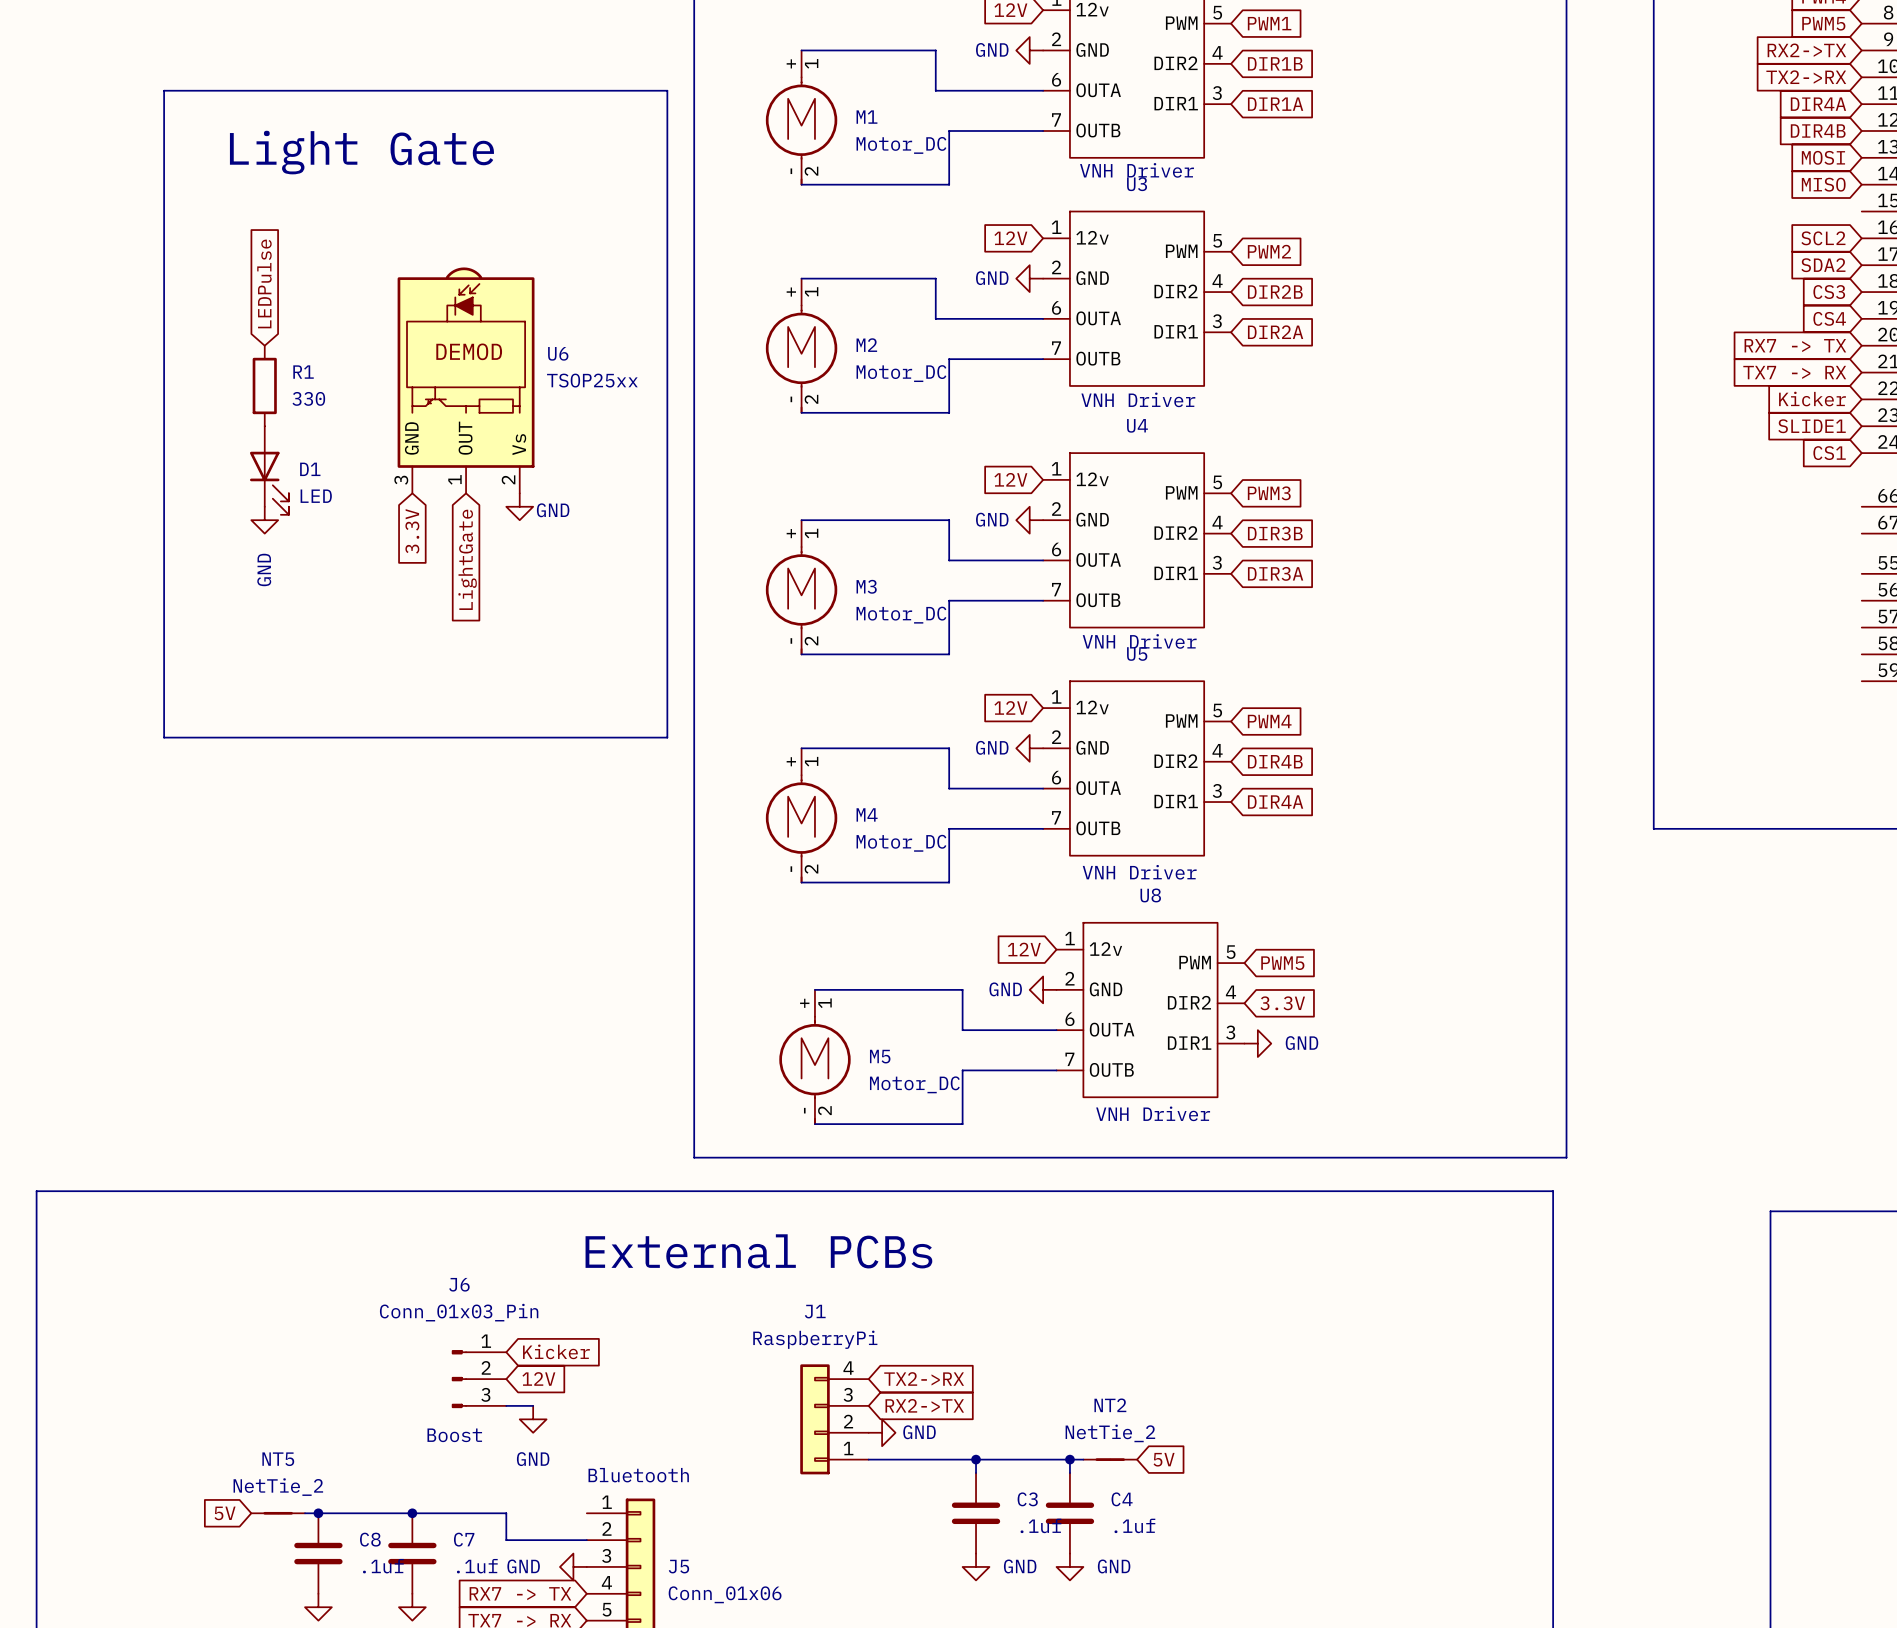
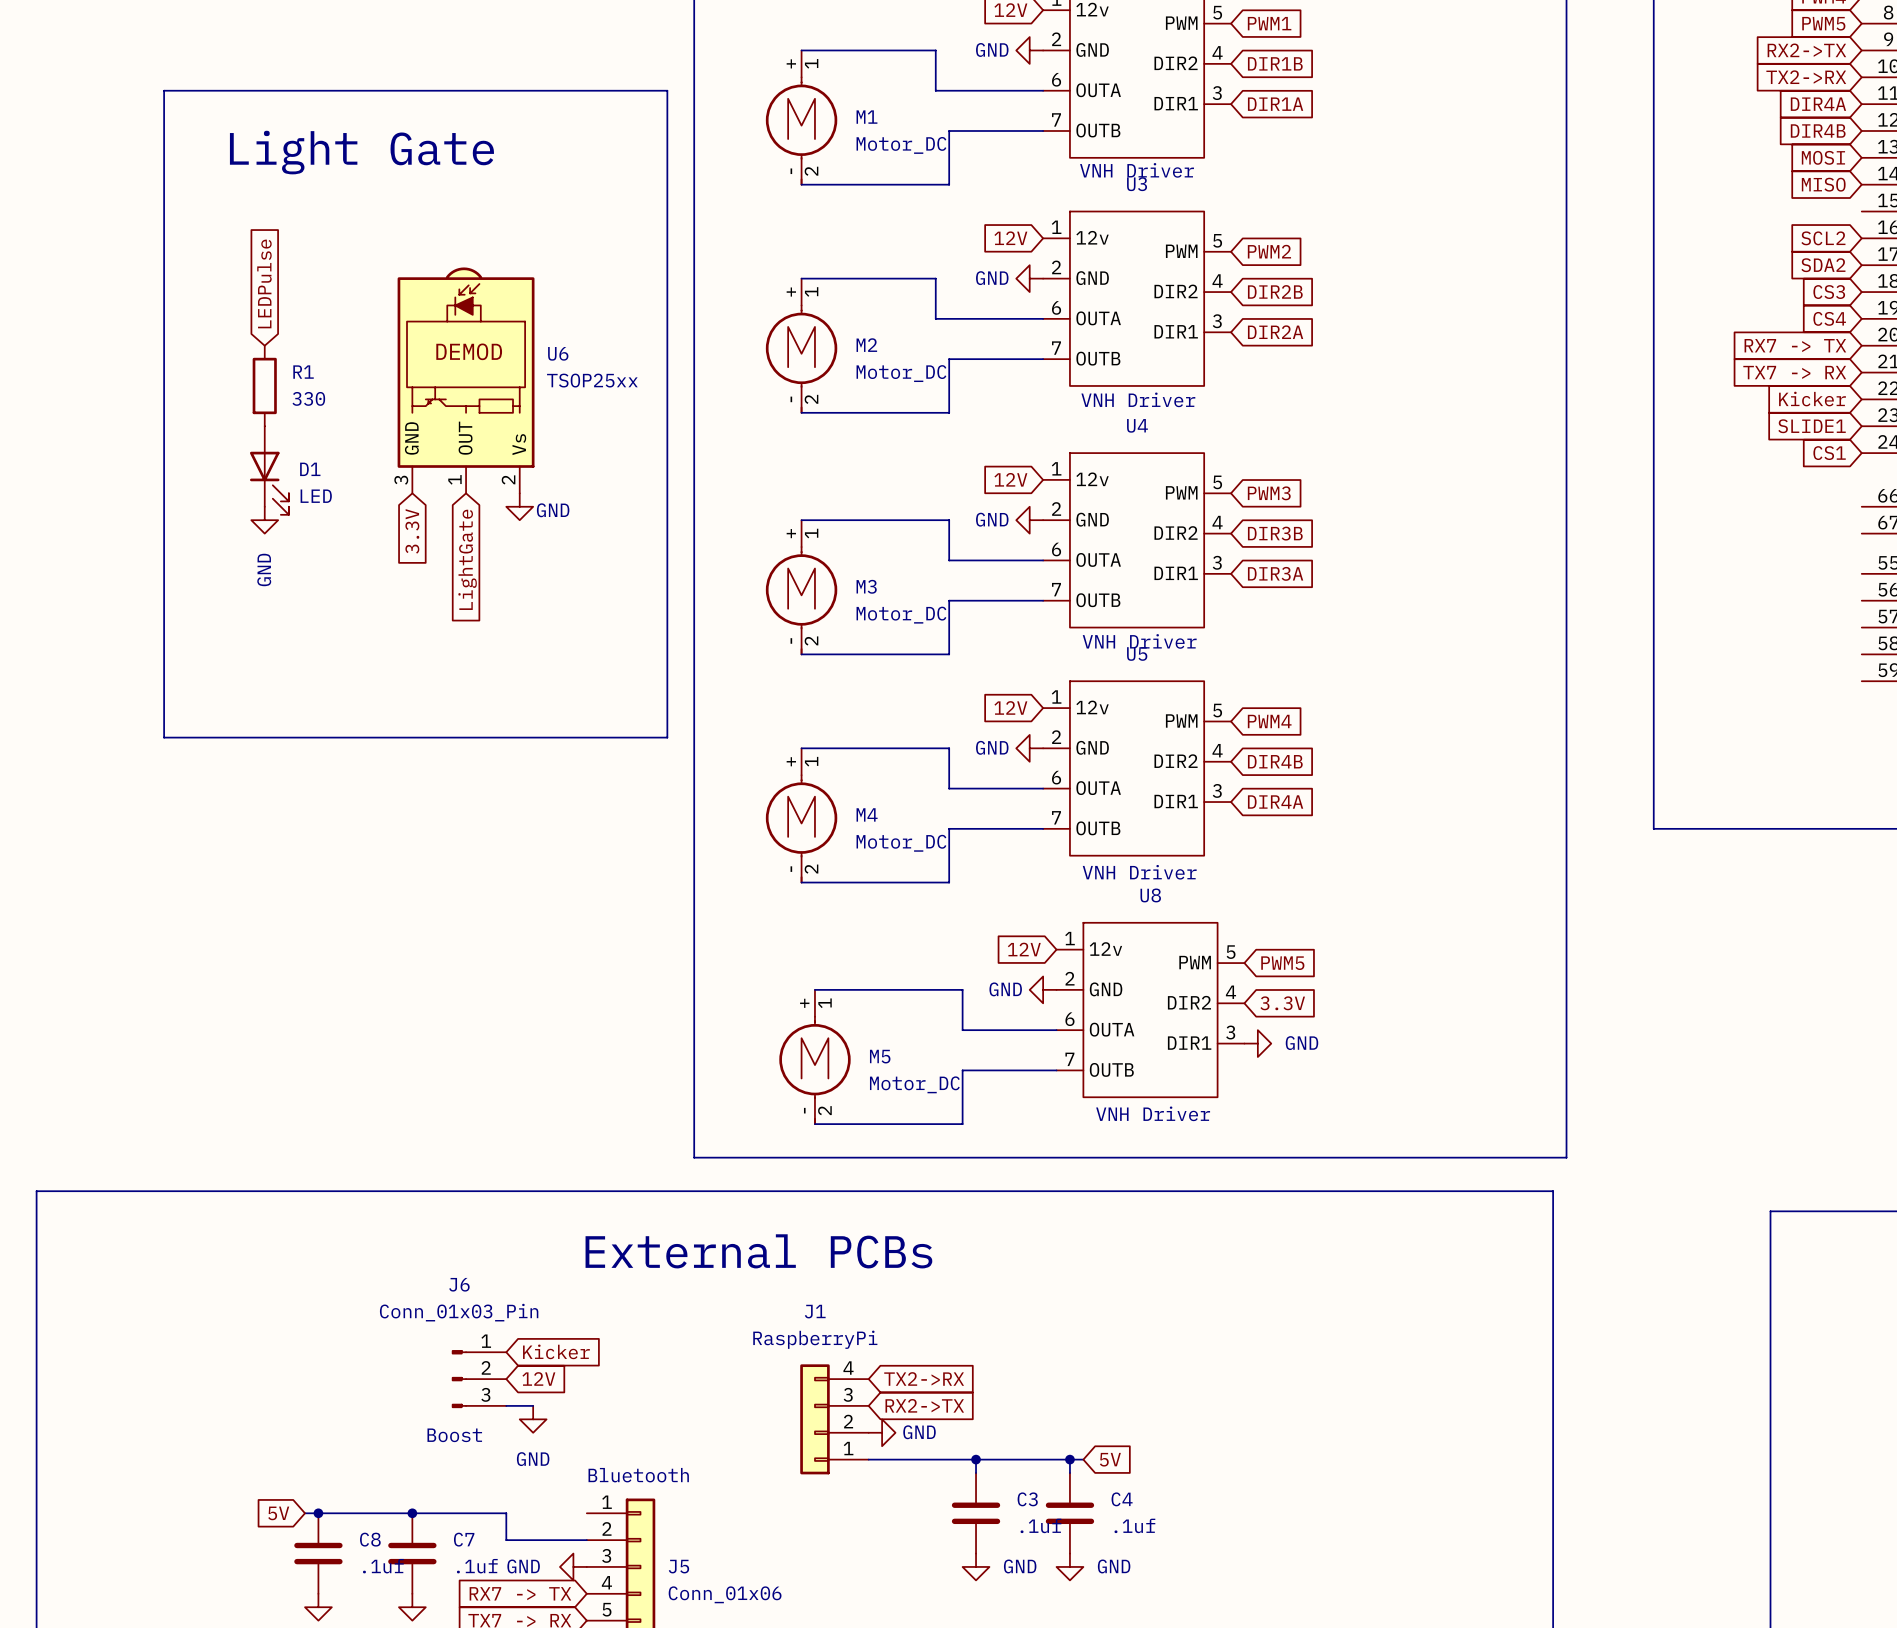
NT2: NetTie_2 (1110, 1459) -> none
global label position: 5V (1164, 1459) -> 5V (1110, 1459)
global label position: 5V (225, 1513) -> 5V (278, 1513)
NT5: NetTie_2 (278, 1513) -> none

